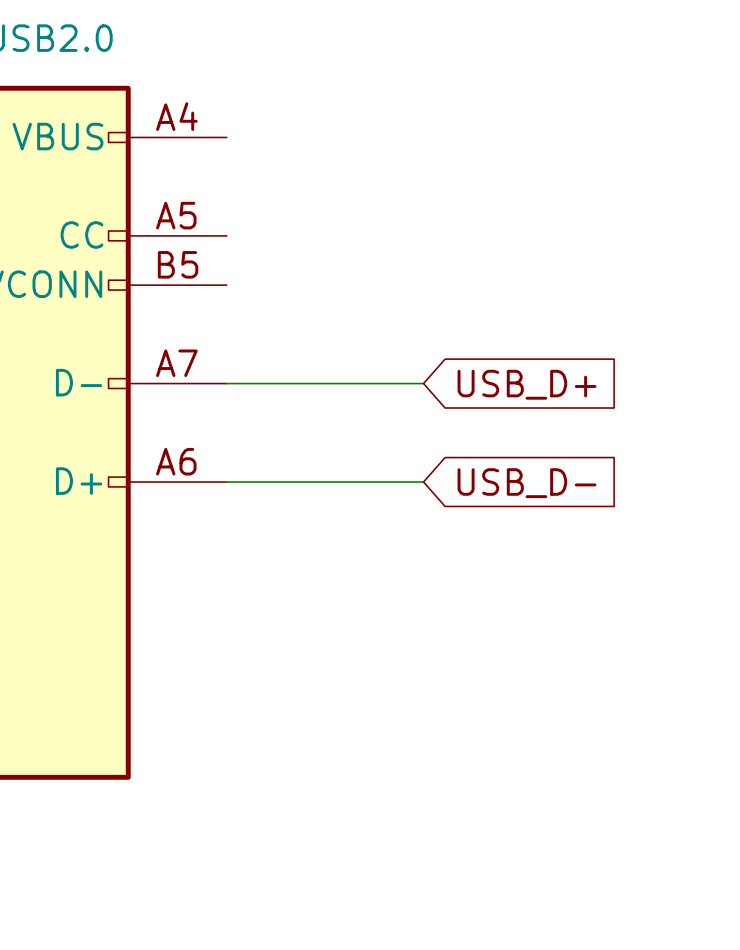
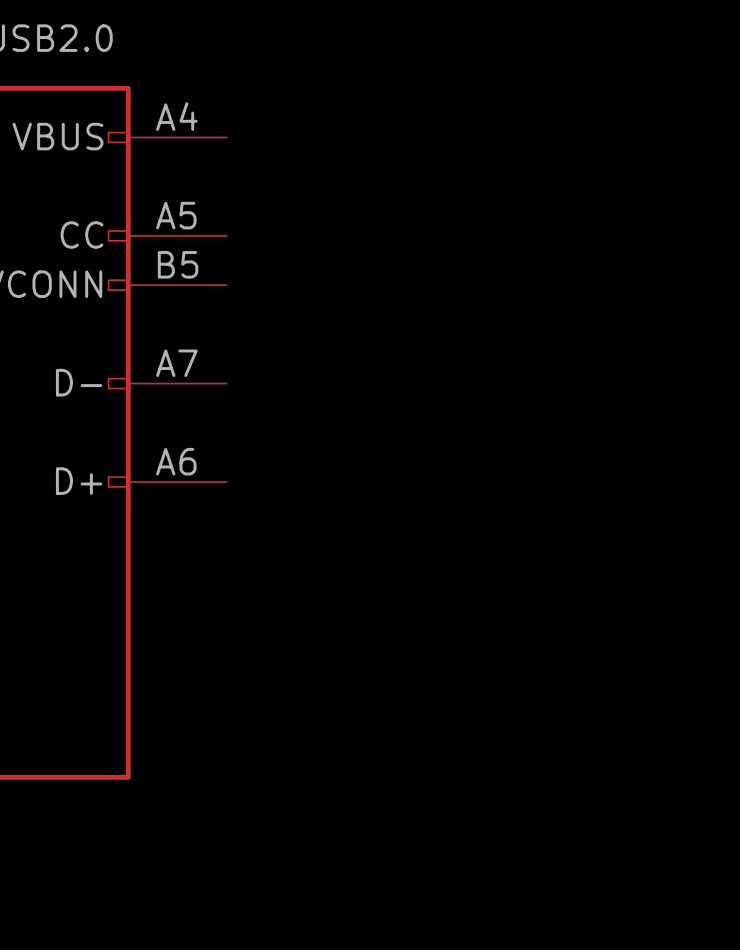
wire: (226, 383) (423, 383) -> none
global label: USB_D+ (527, 384) -> none
wire: (226, 482) (423, 482) -> none
global label: USB_D- (527, 483) -> none

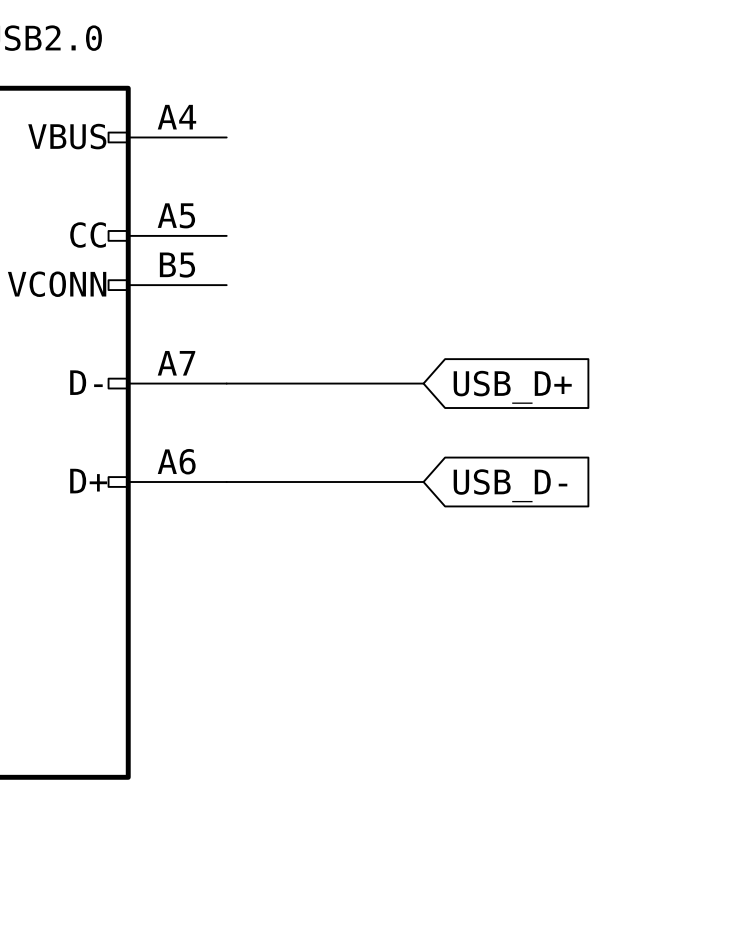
wire: none -> (226, 383) (423, 383)
global label: none -> USB_D+ (512, 387)
wire: none -> (226, 482) (423, 482)
global label: none -> USB_D- (510, 485)

